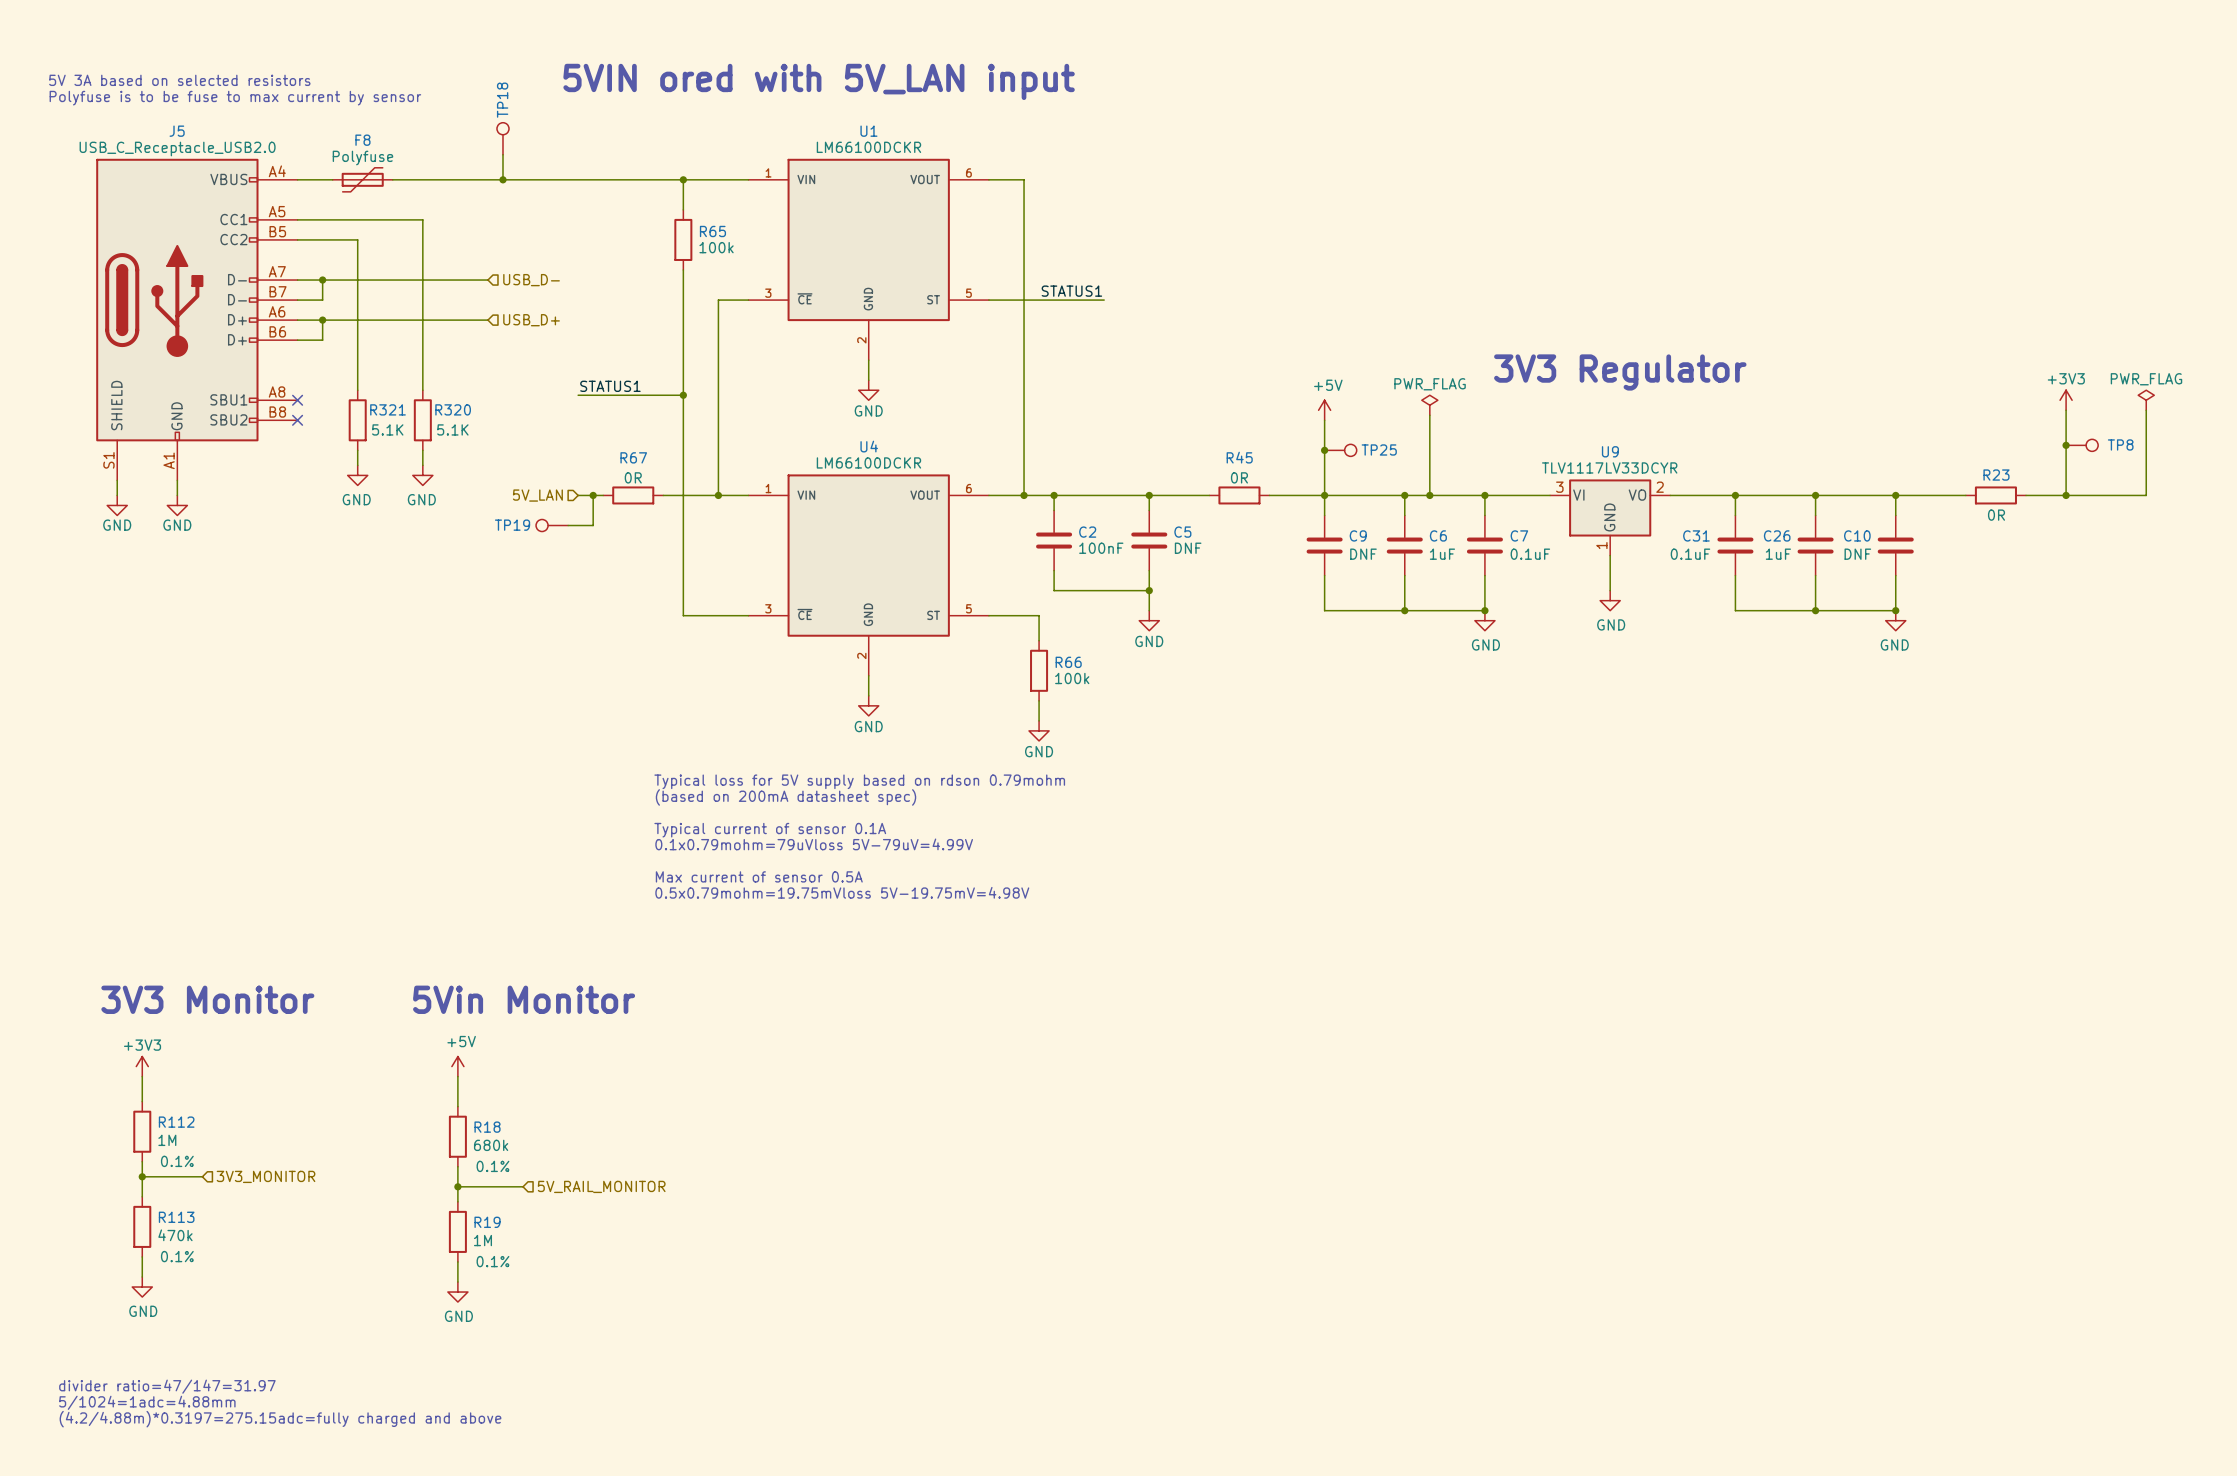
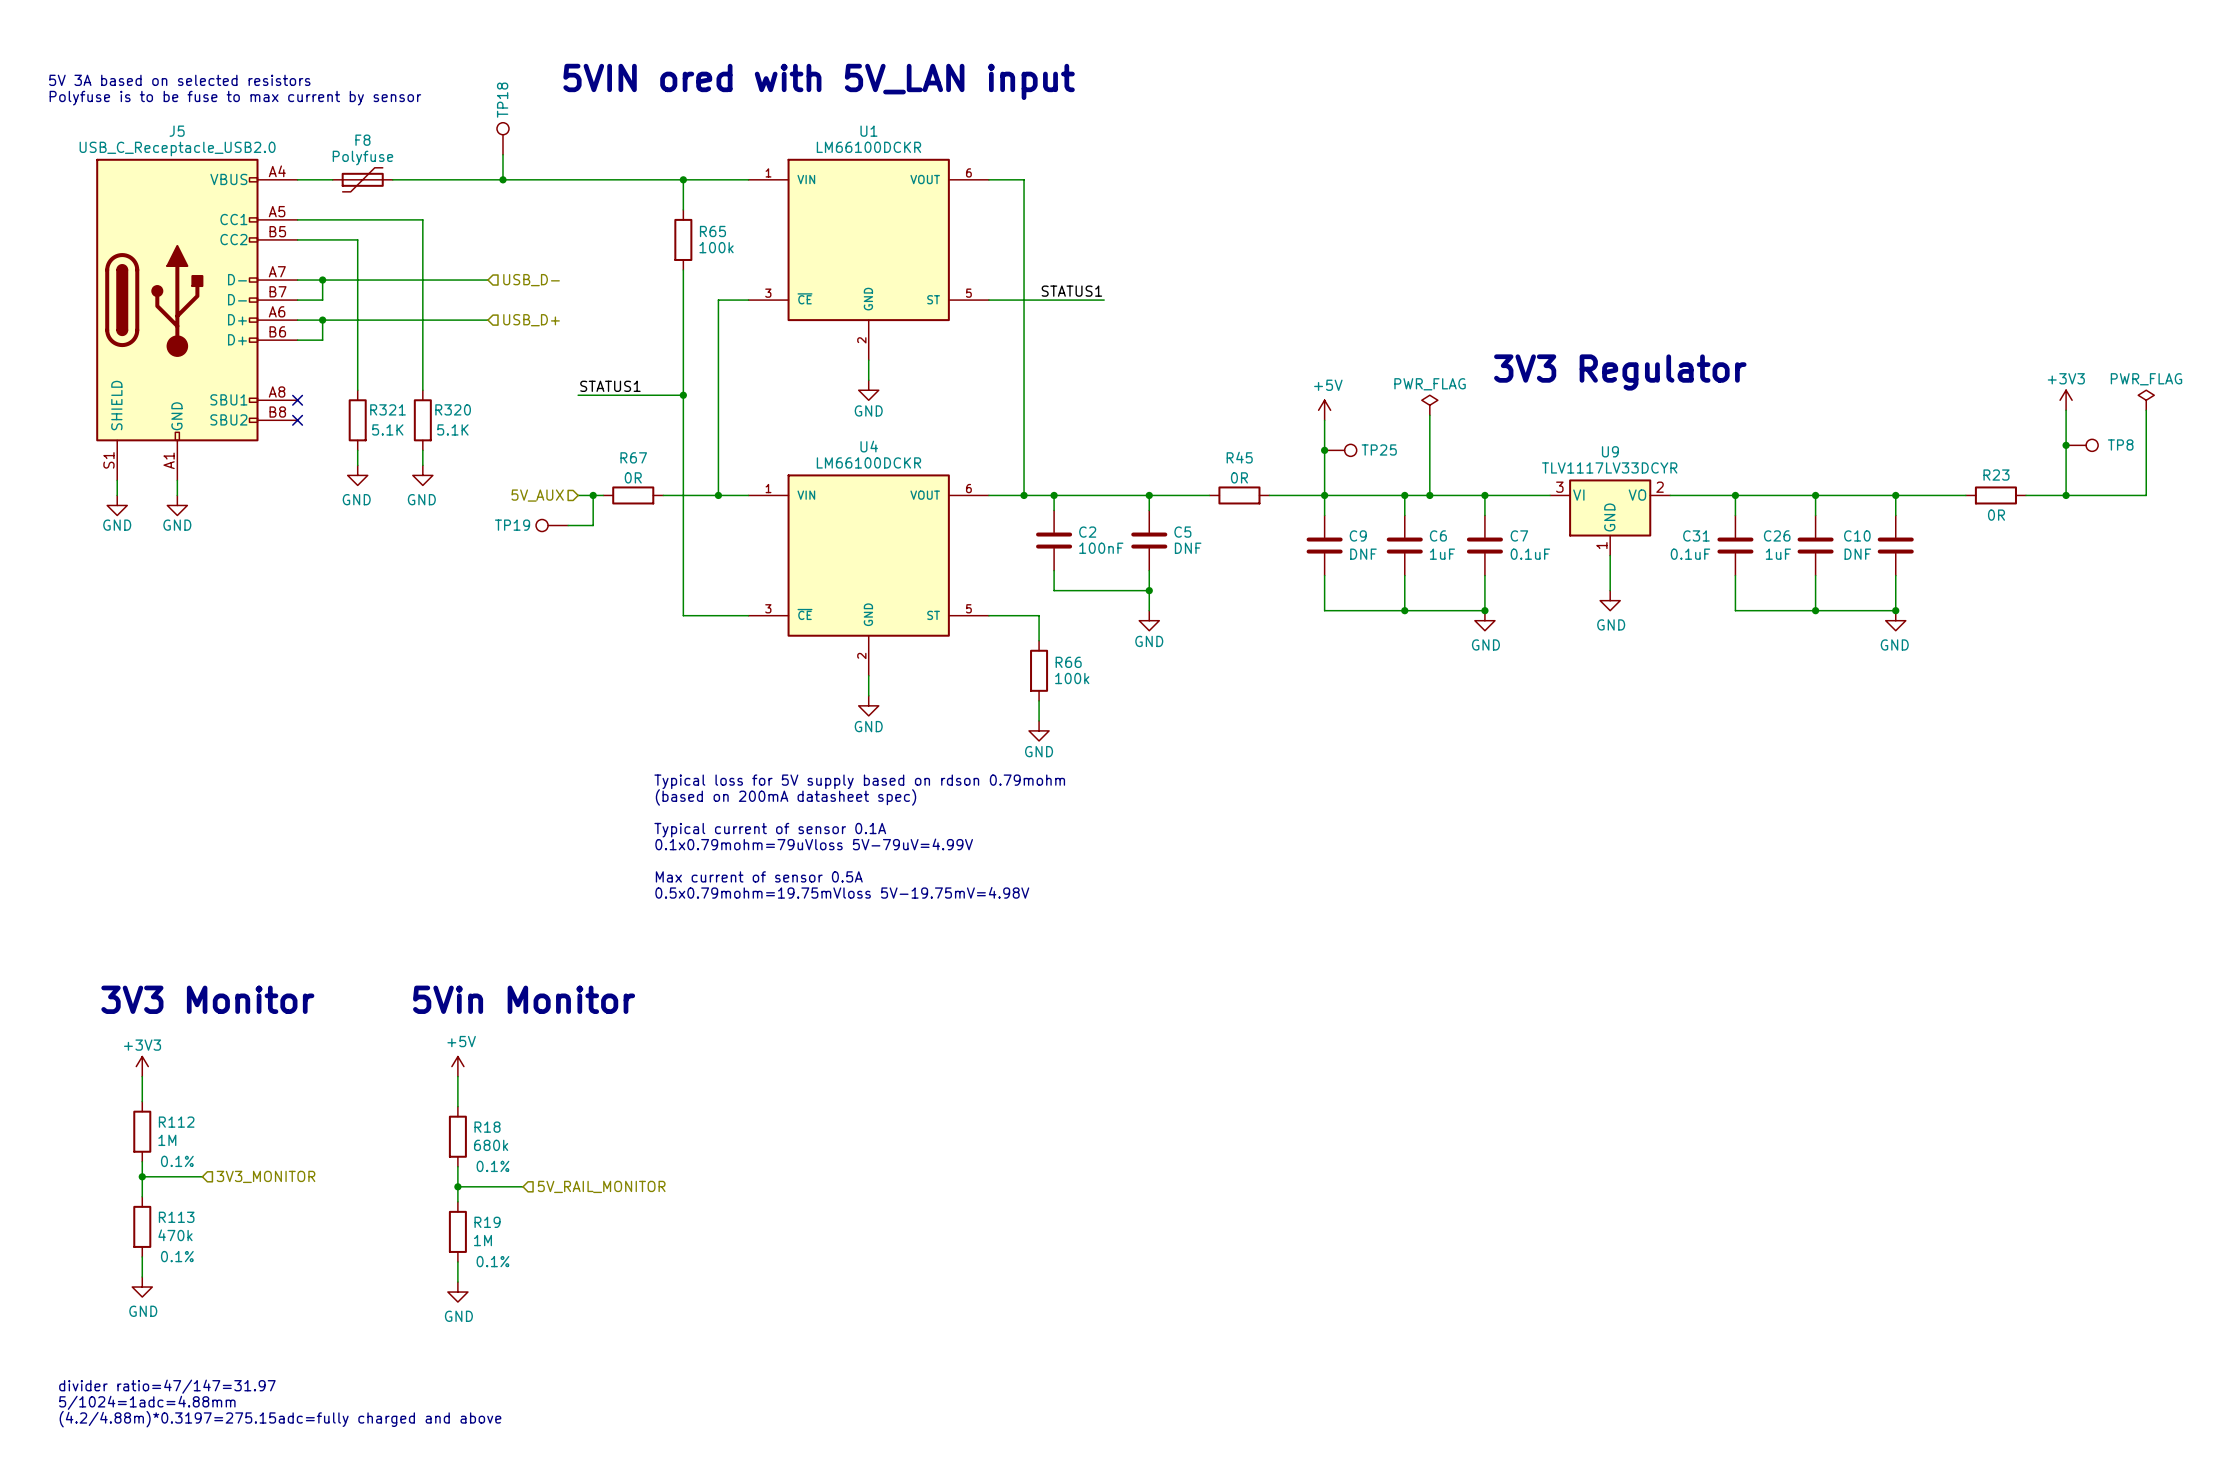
hierarchical label: 5V_LAN (537, 495) -> 5V_AUX (537, 495)

